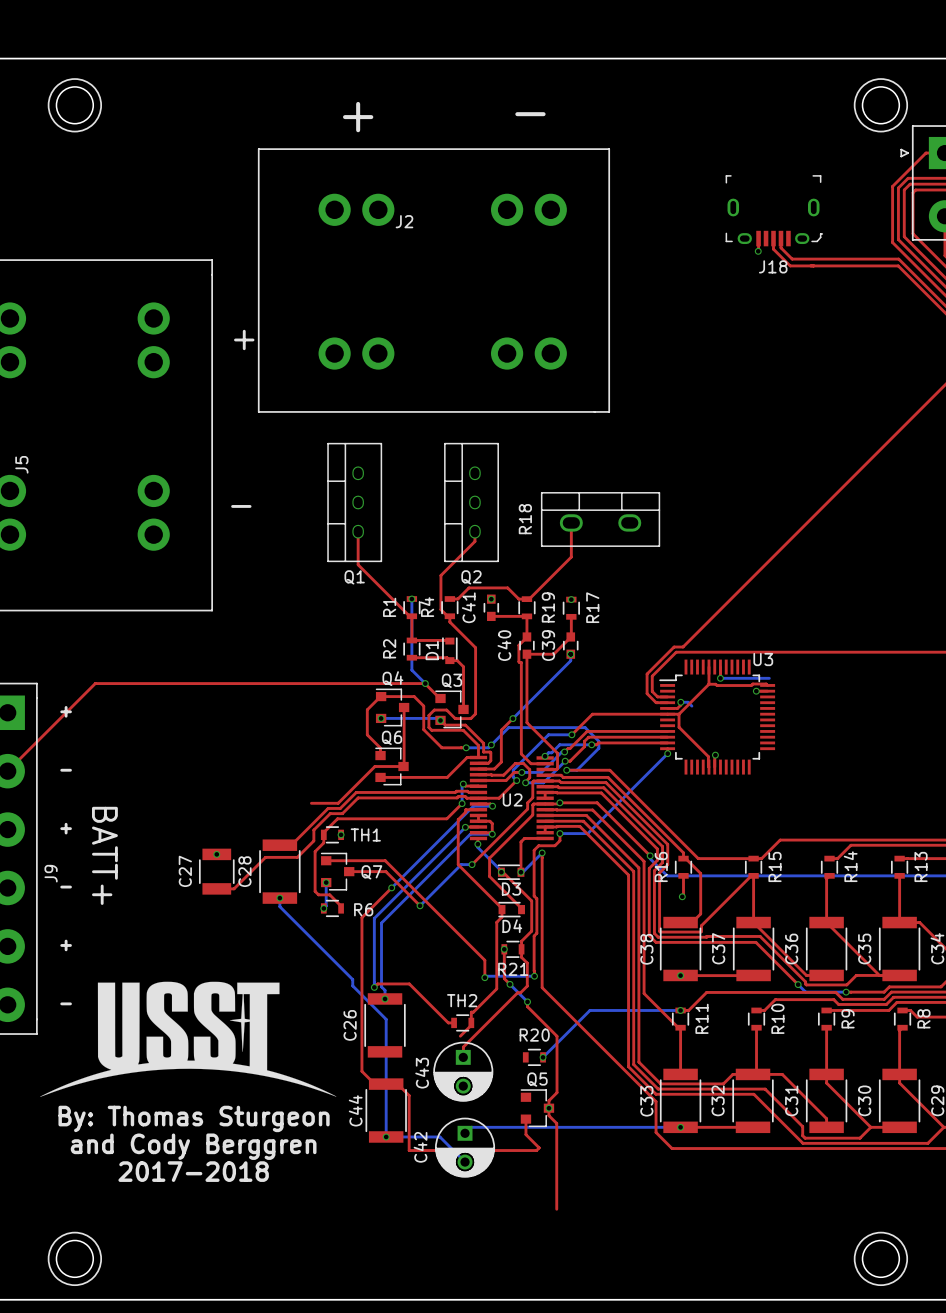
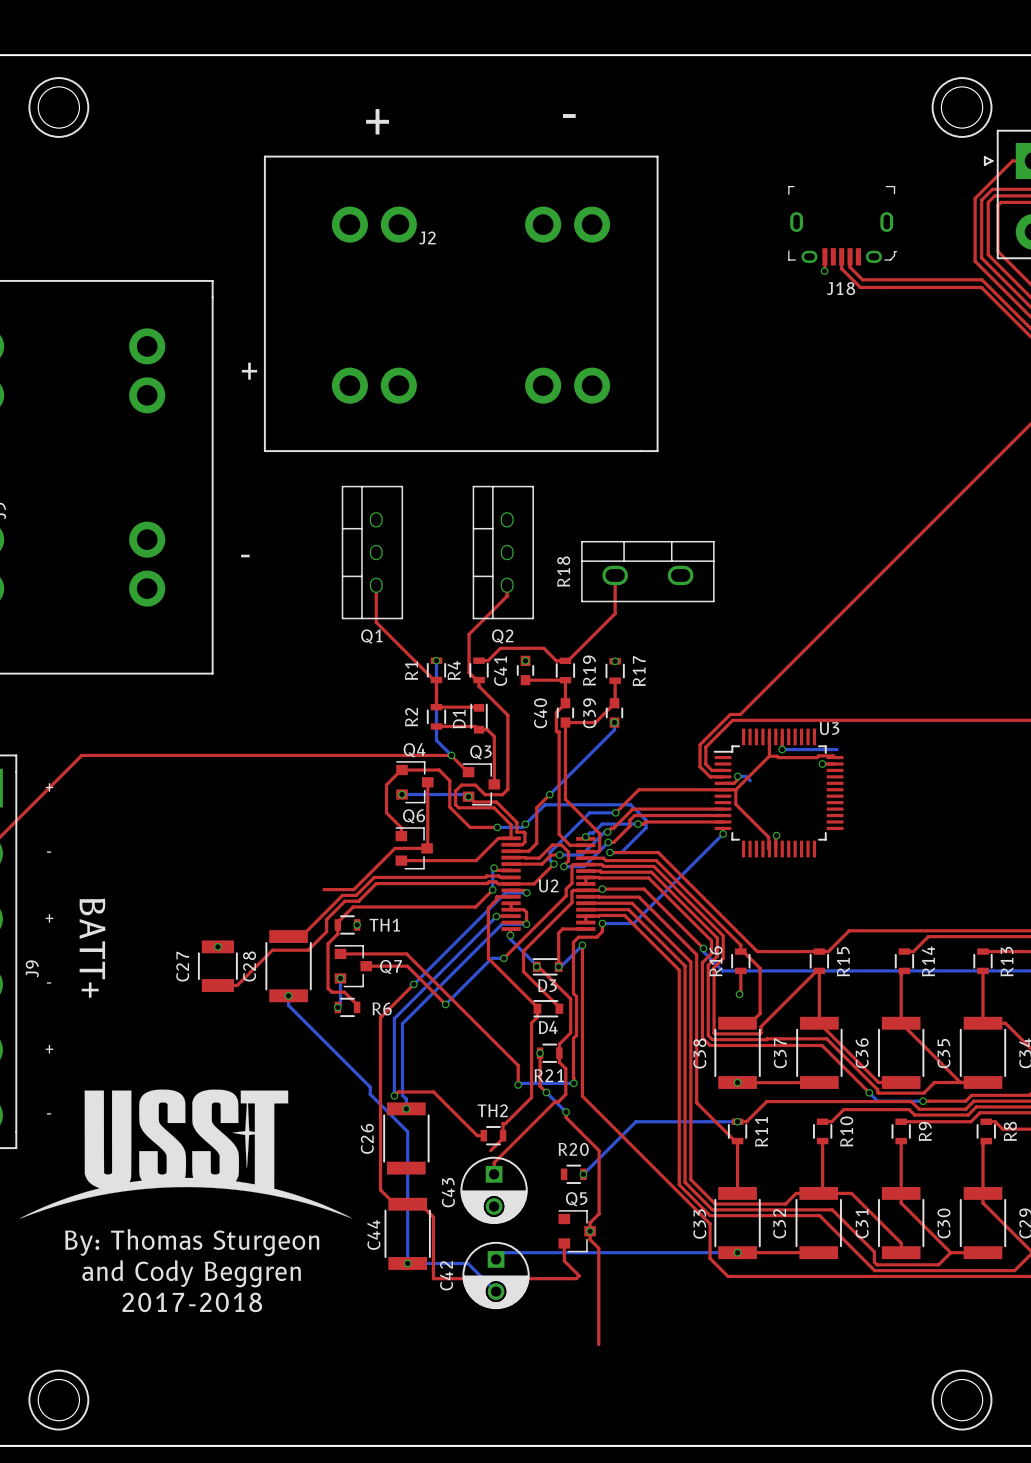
text: and Cody Berggren (193, 1146) -> and Cody Beggren (191, 1273)

